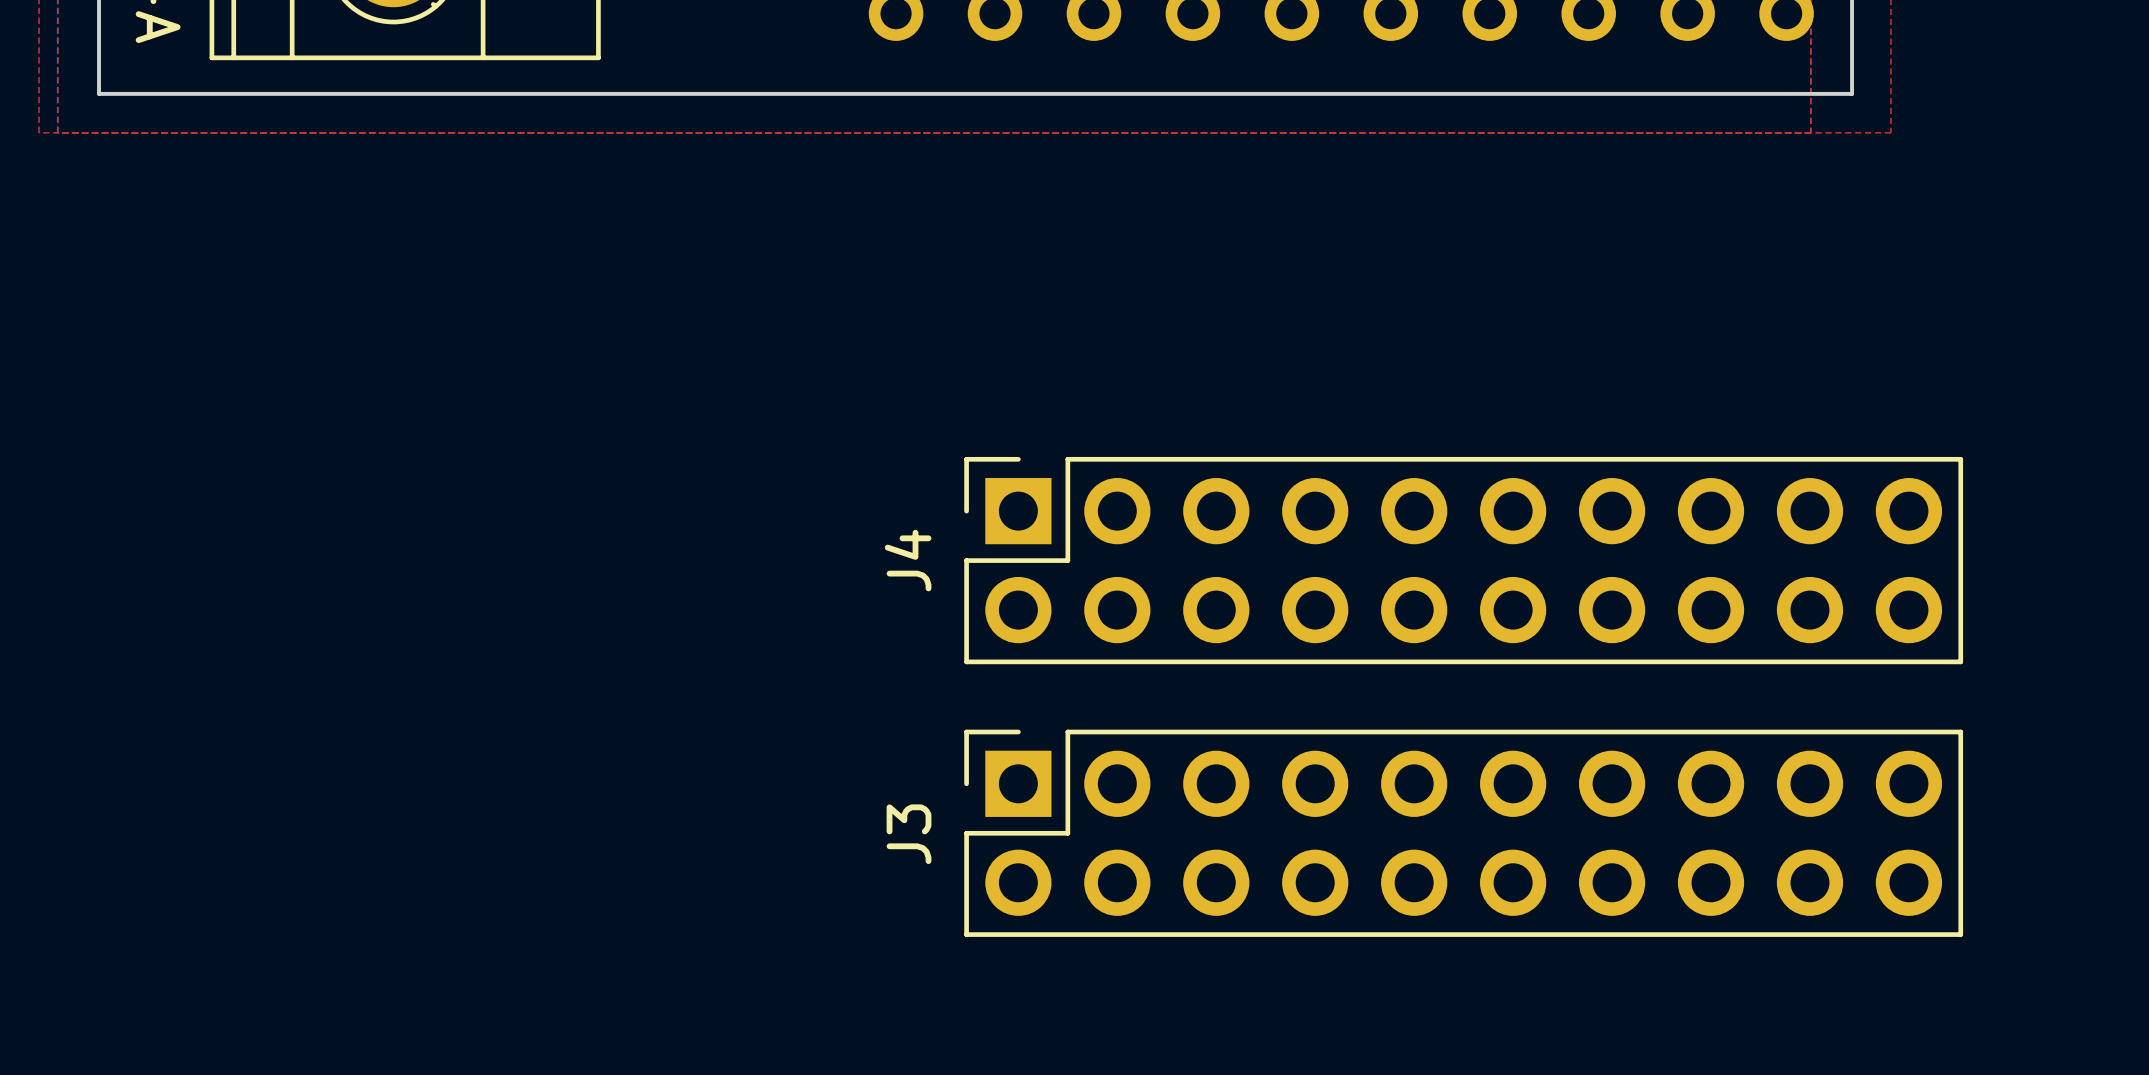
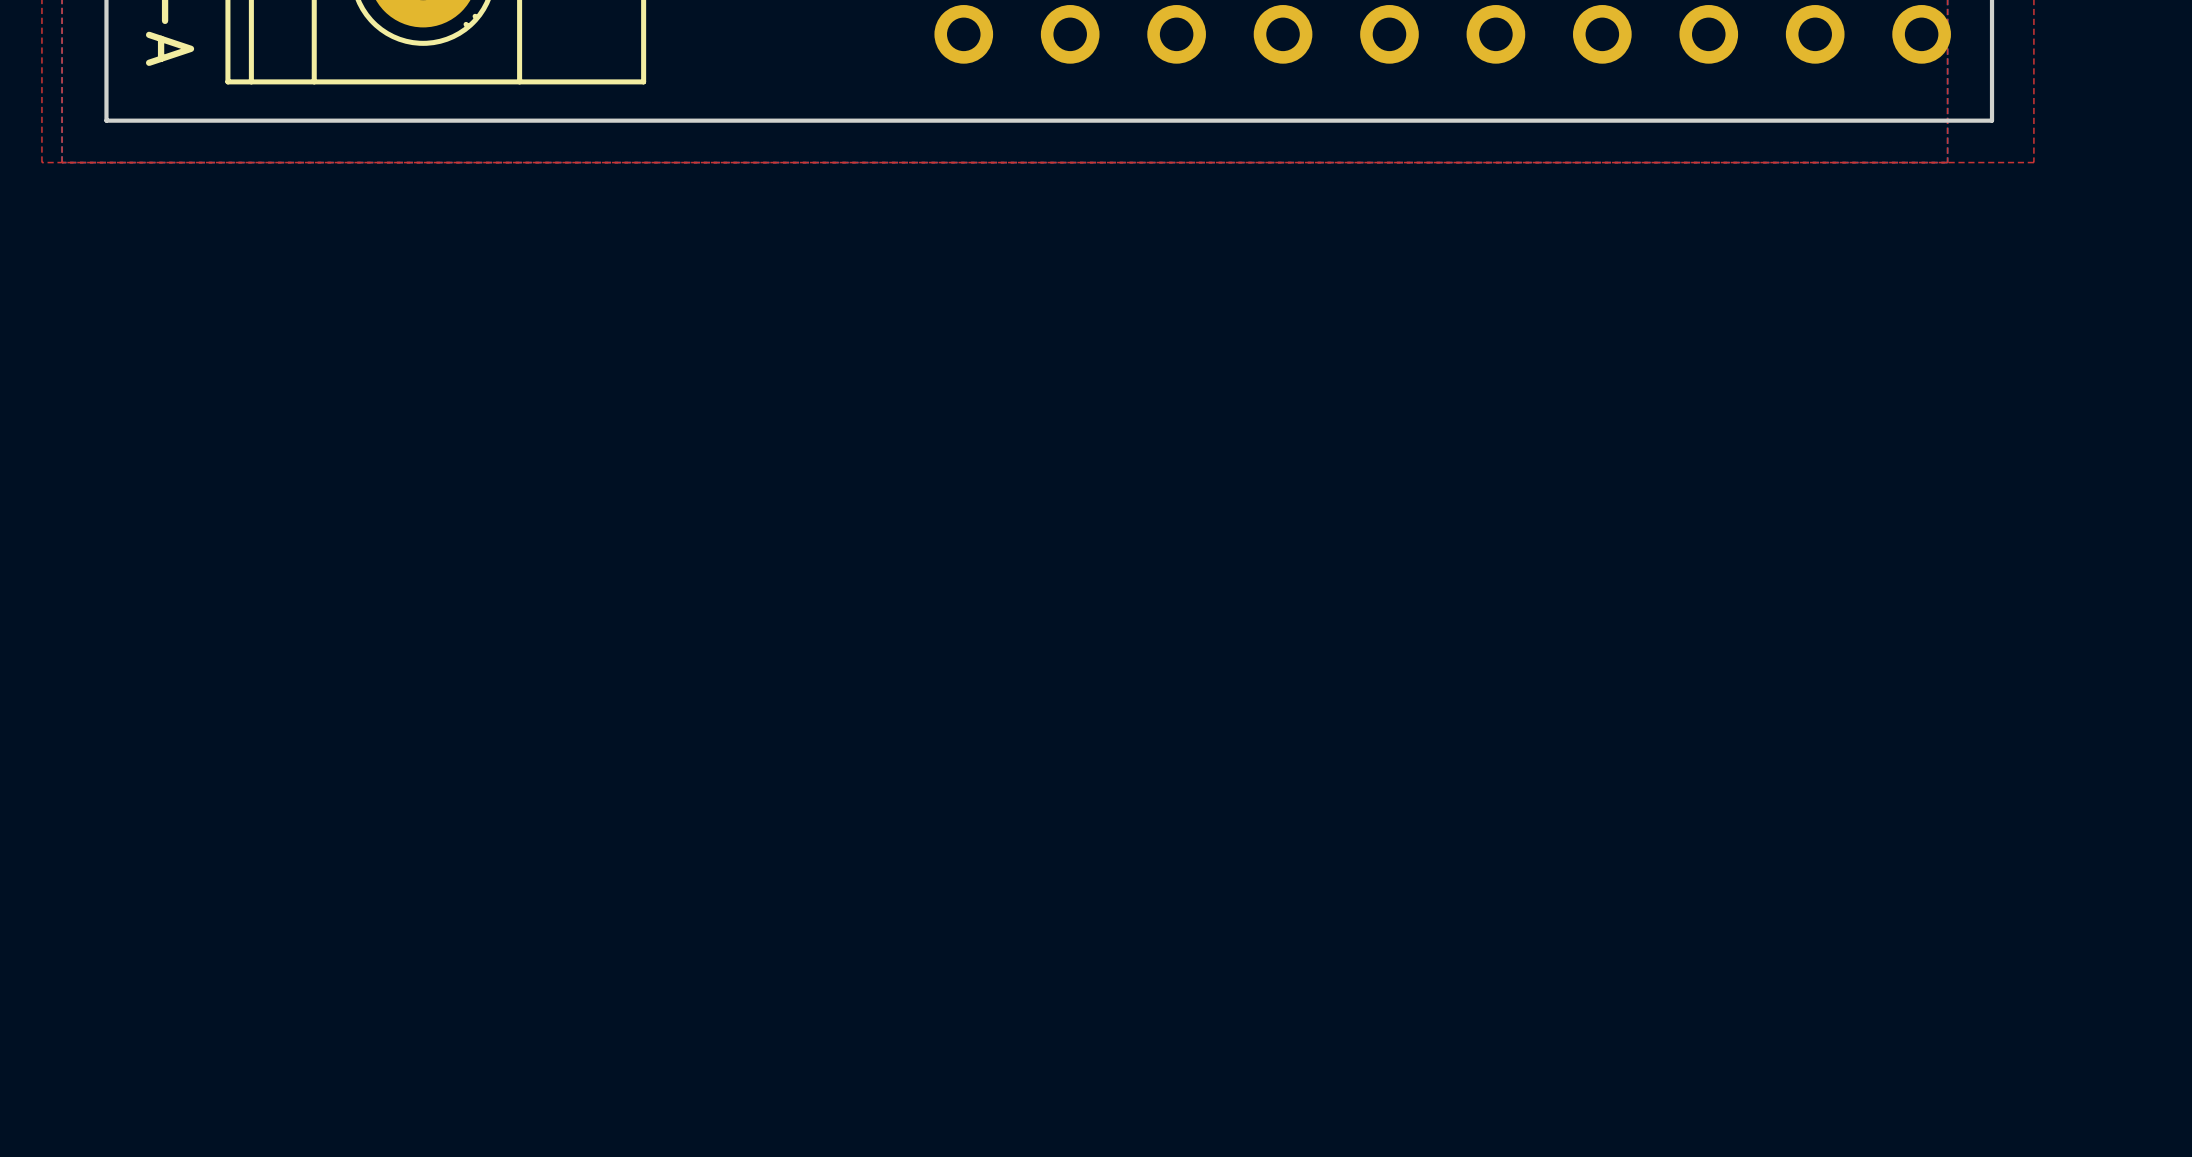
J4: (1463, 560) -> none
J3: (1463, 833) -> none

